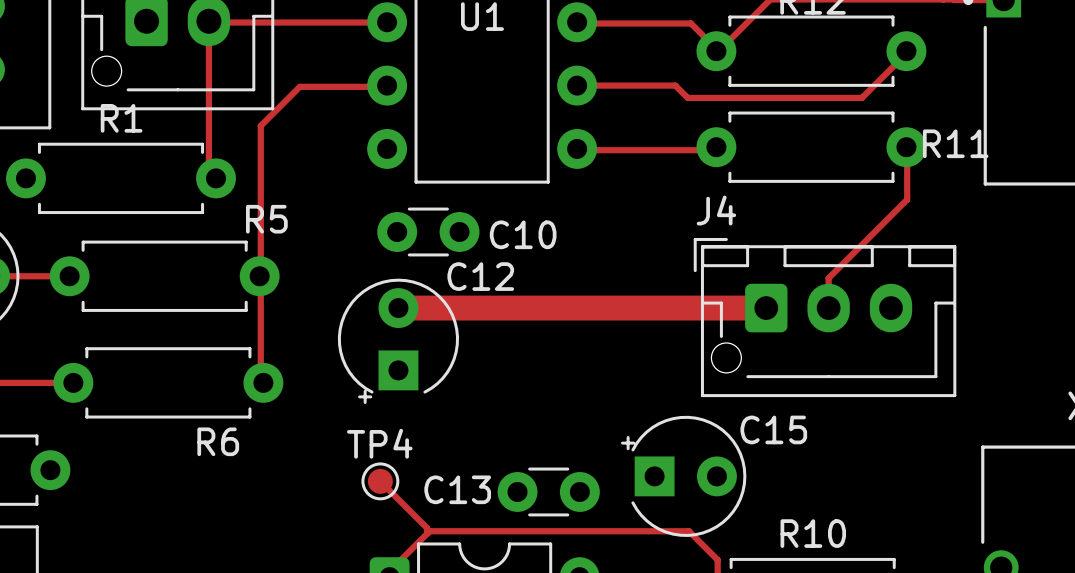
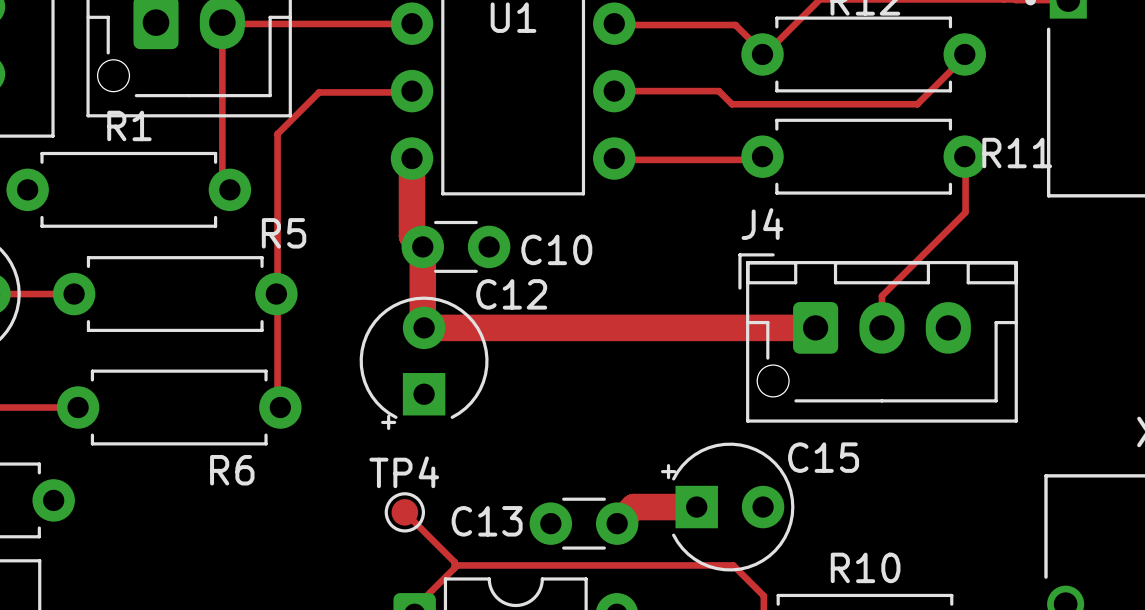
track: none -> (412, 158) (412, 236) (422, 246) (422, 326)
track: none -> (696, 507) (633, 507) (617, 523)

